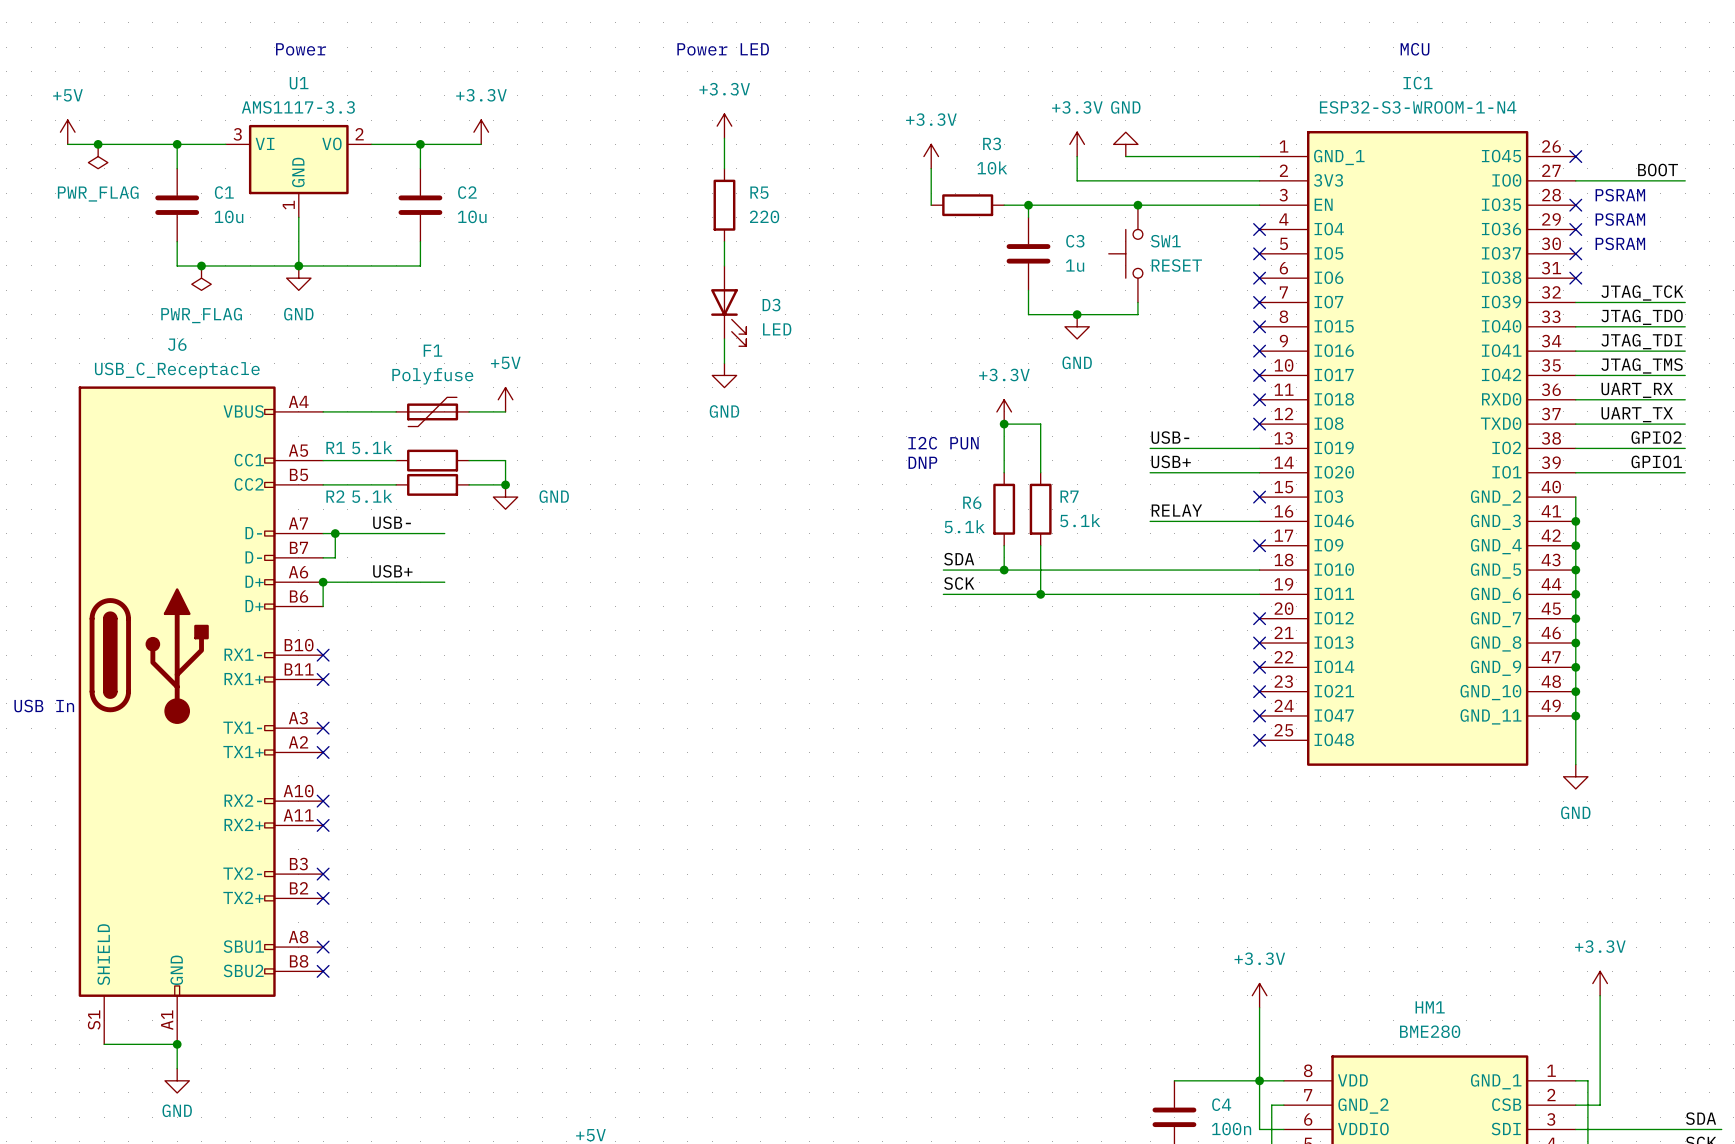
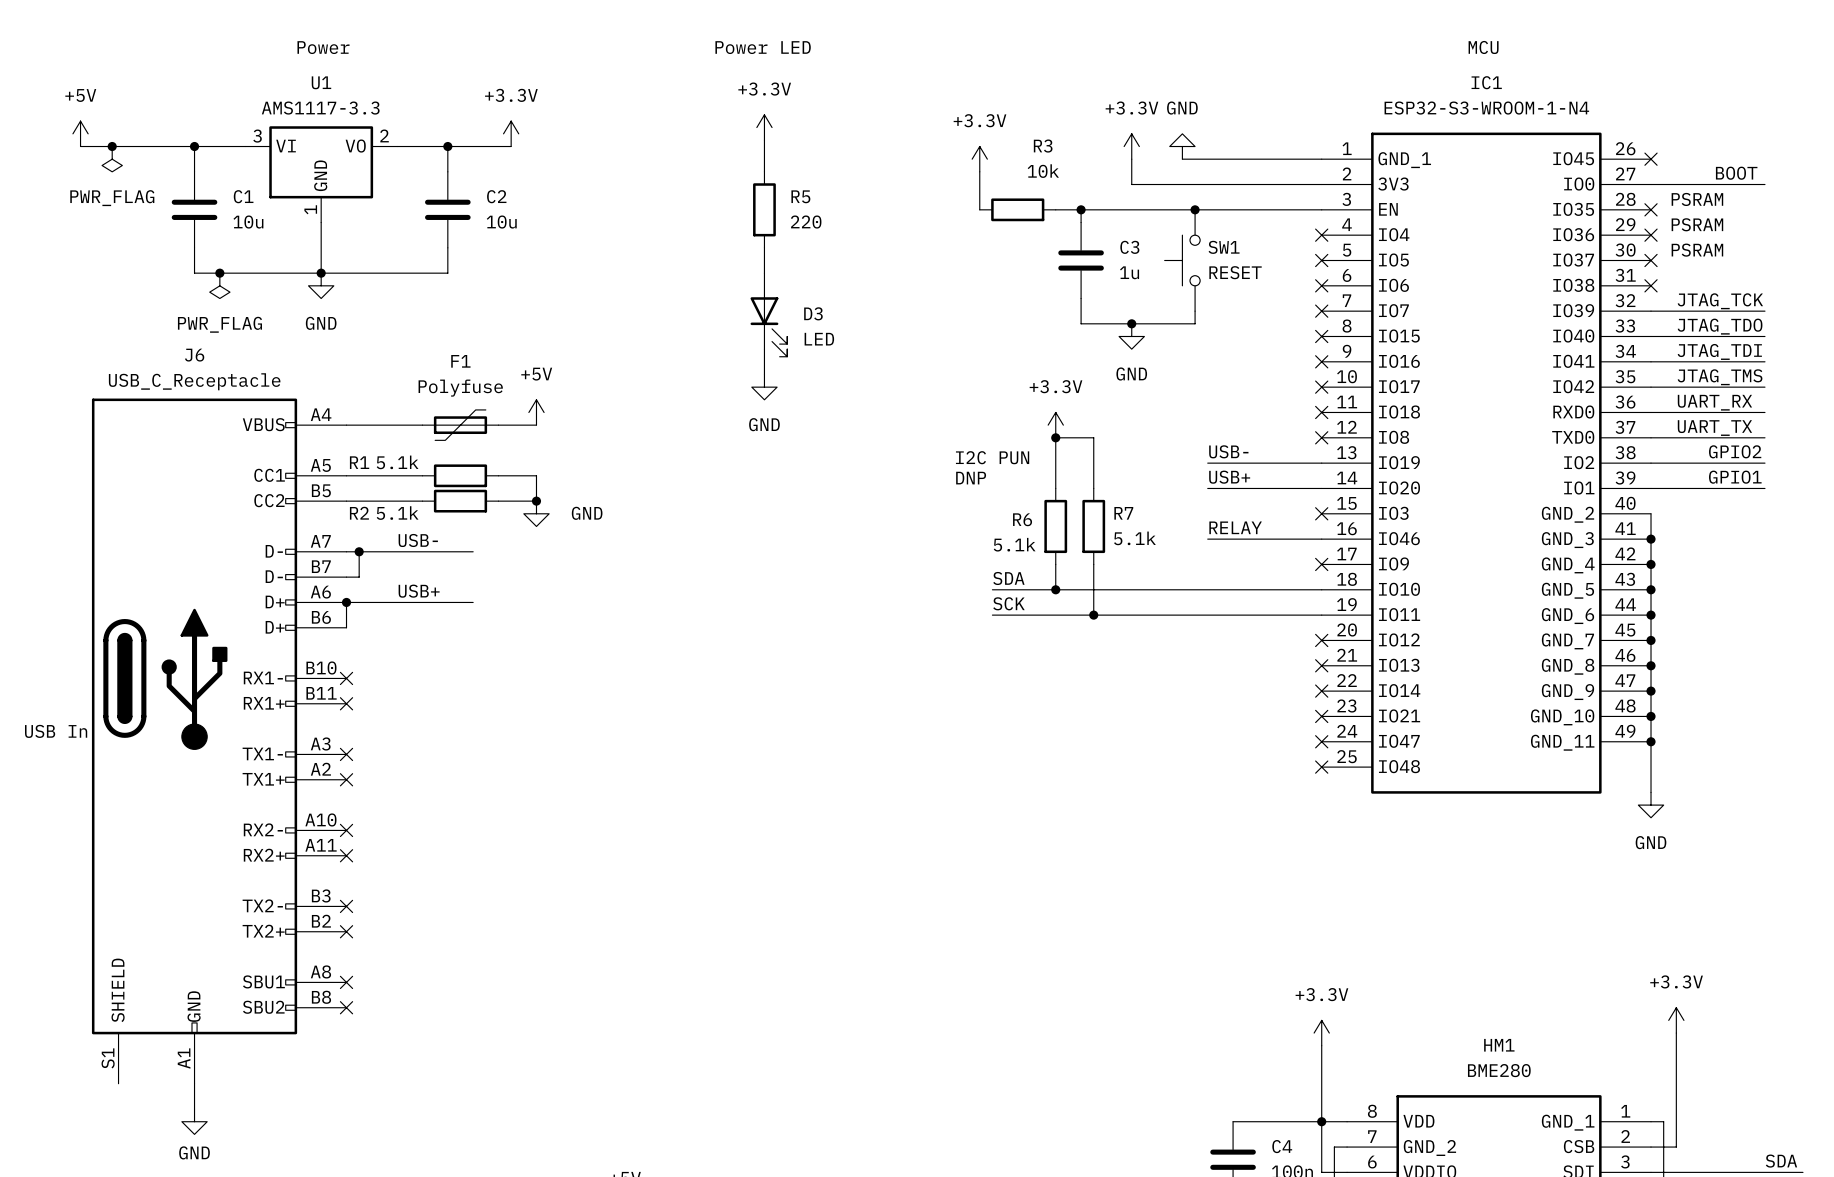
wire: (104, 1044) (177, 1044) -> none
junction: (177, 1044) -> none

